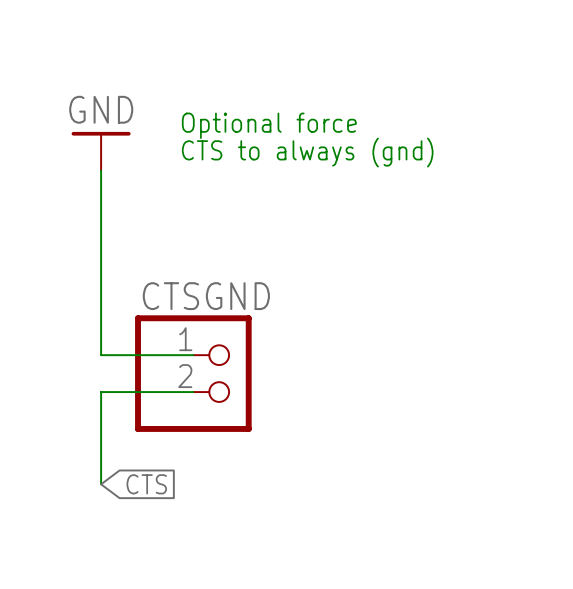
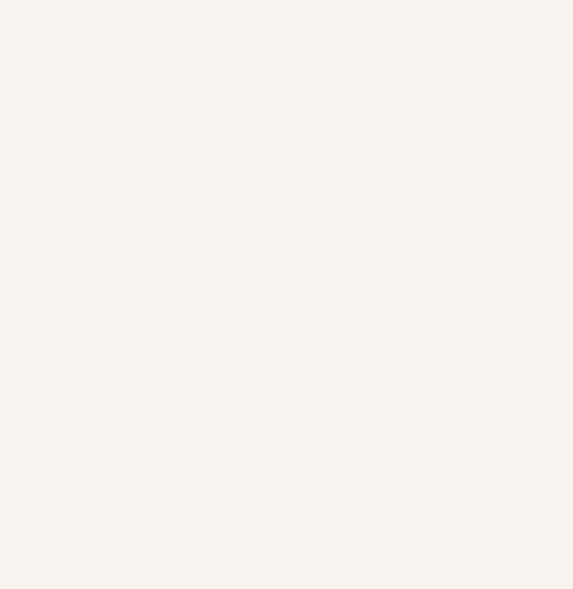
text: Optional force (269, 125) -> none
power symbol: GND (101, 151) -> none
text: CTS to always (gnd) (307, 152) -> none
wire: (101, 170) (101, 355) (193, 355) -> none
CTSGND: (193, 373) -> none
wire: (193, 392) (101, 392) (101, 484) -> none
global label: CTS (146, 484) -> none

